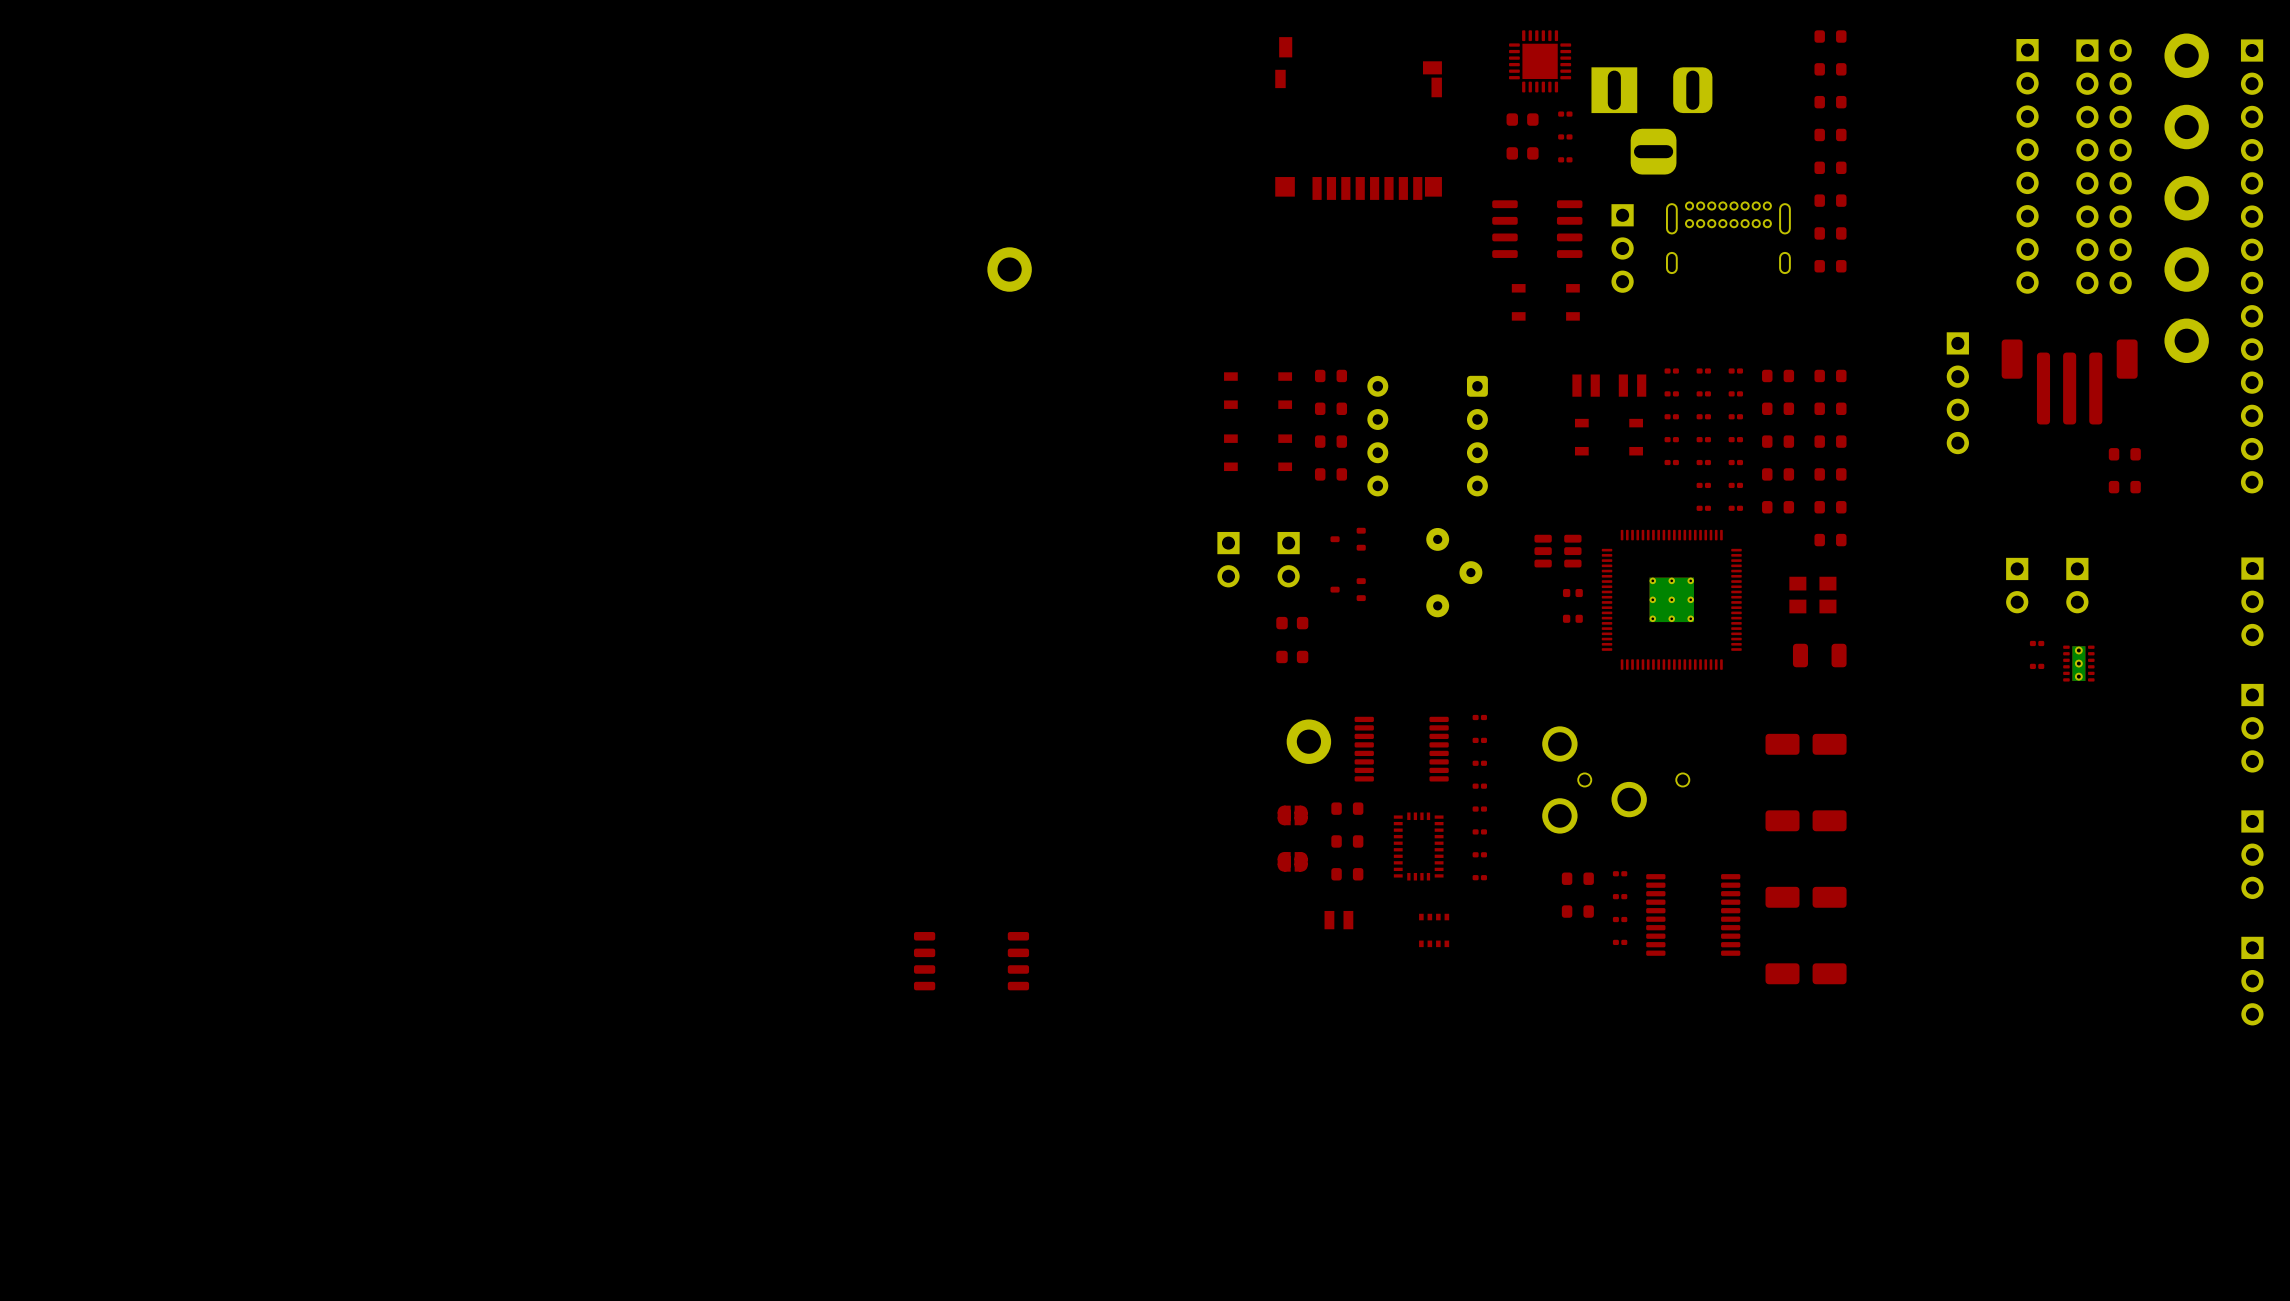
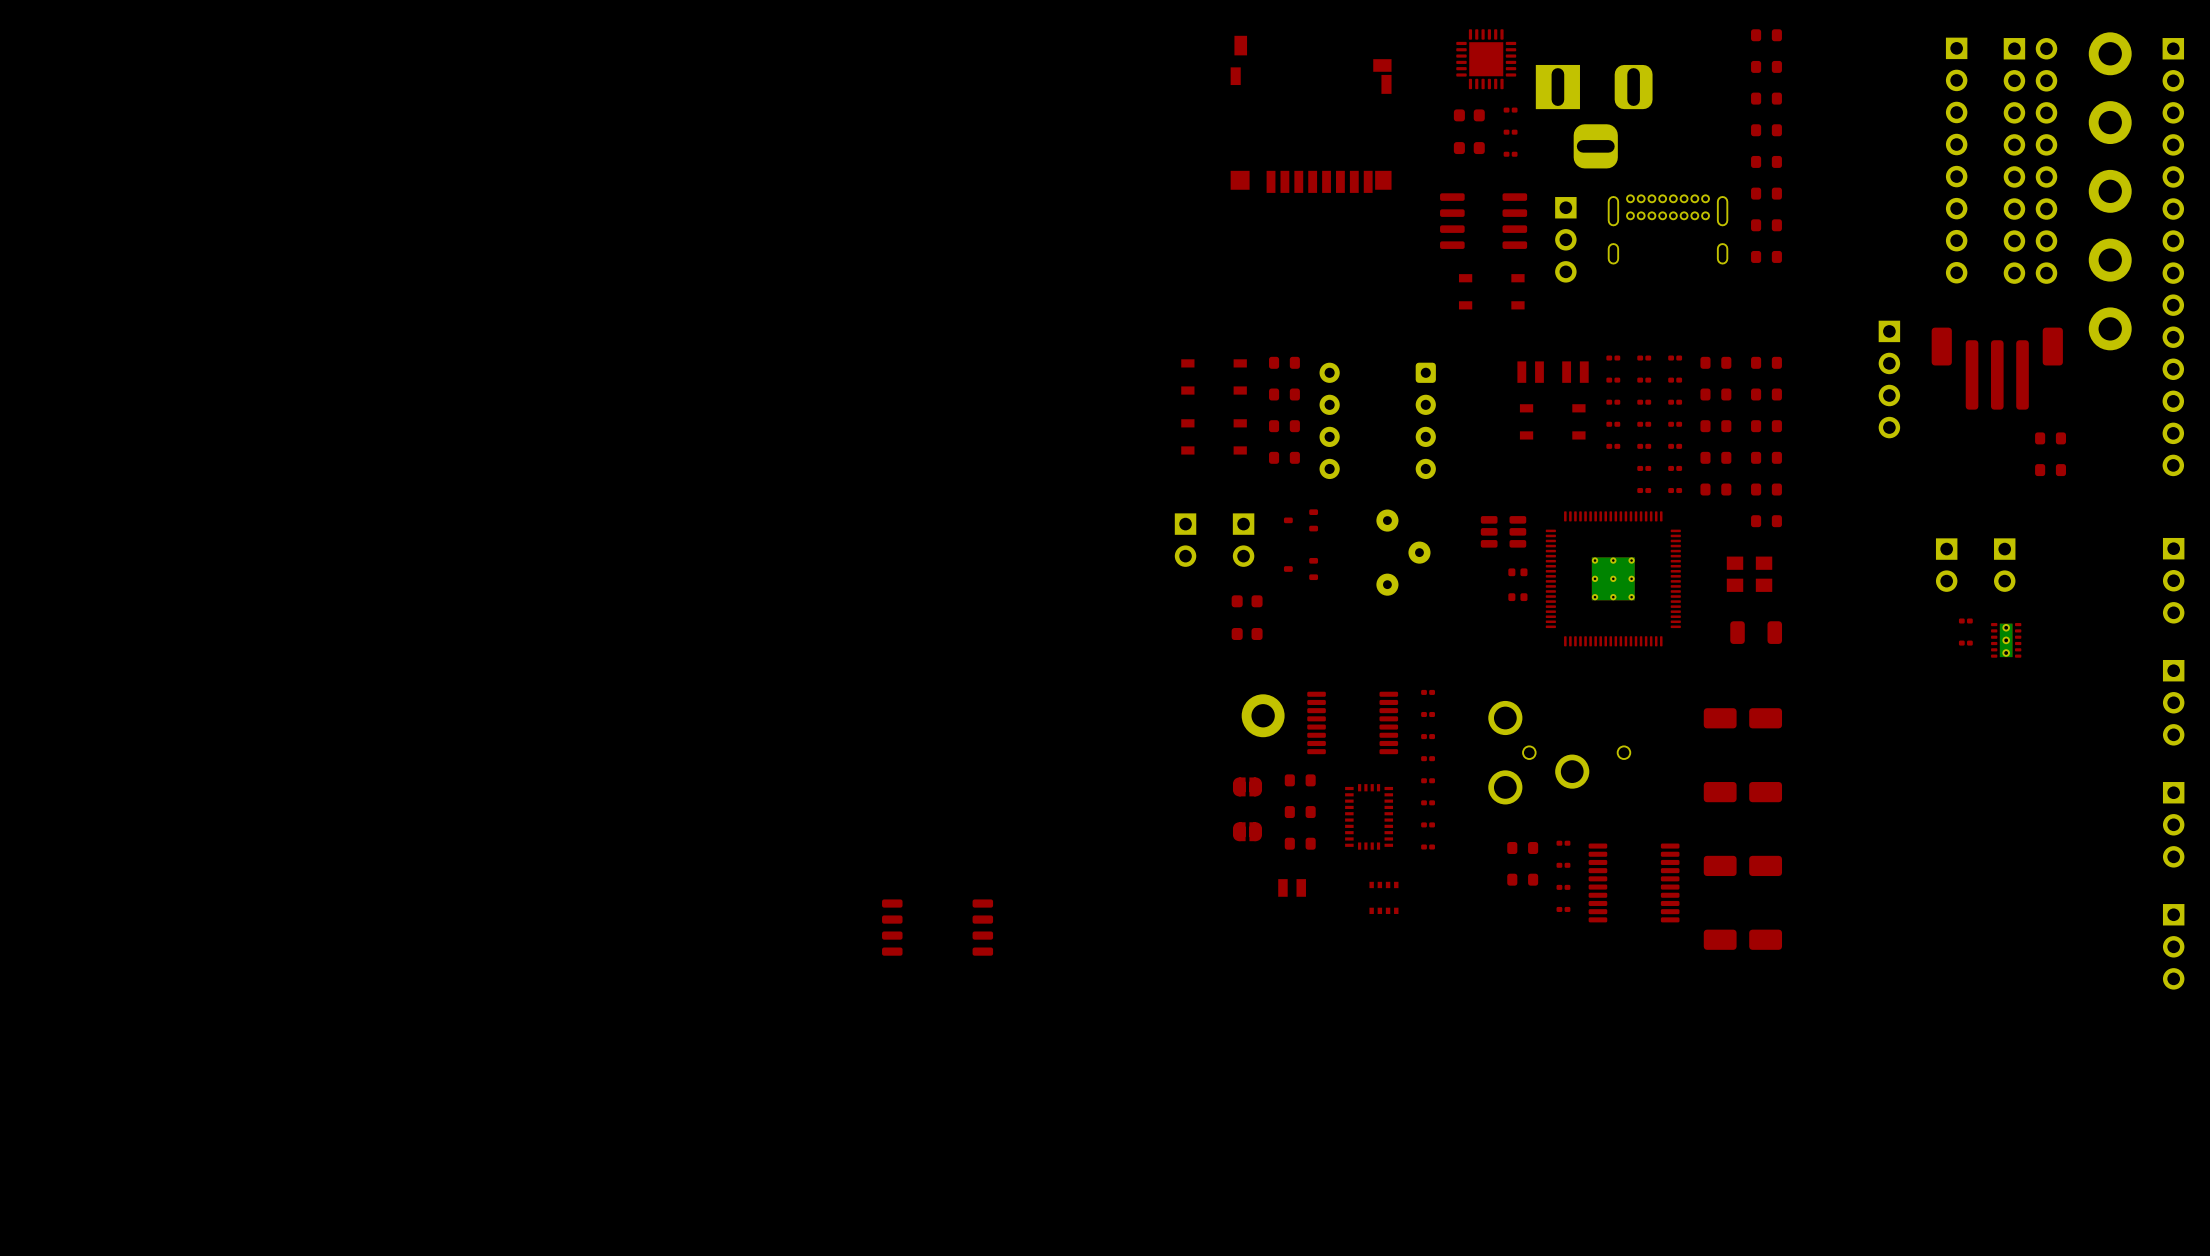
part: (1009, 269) -> none

